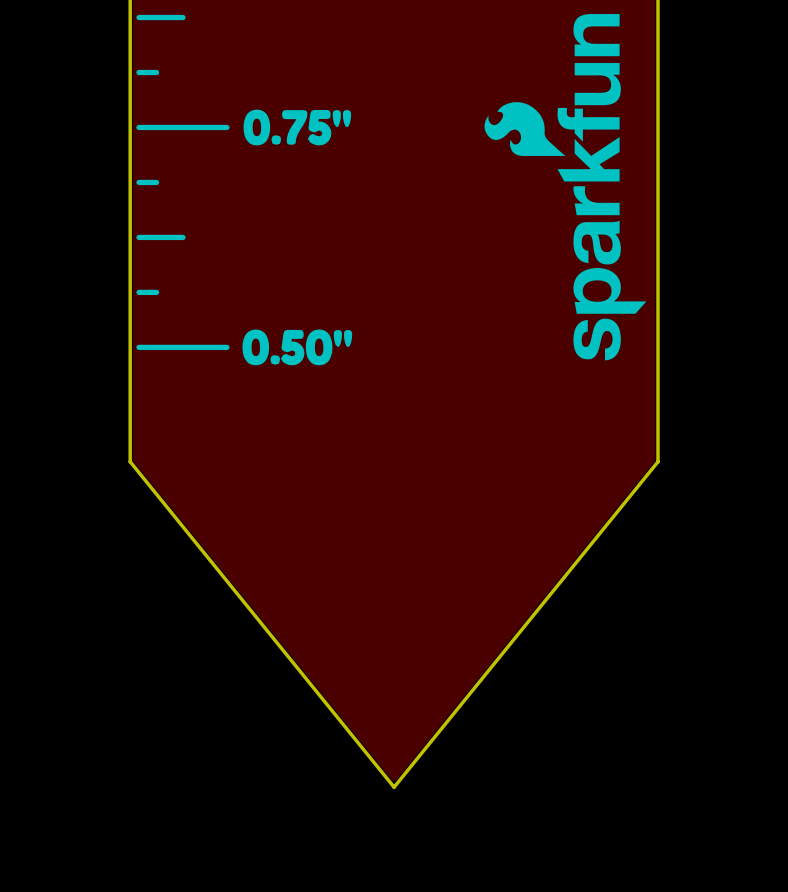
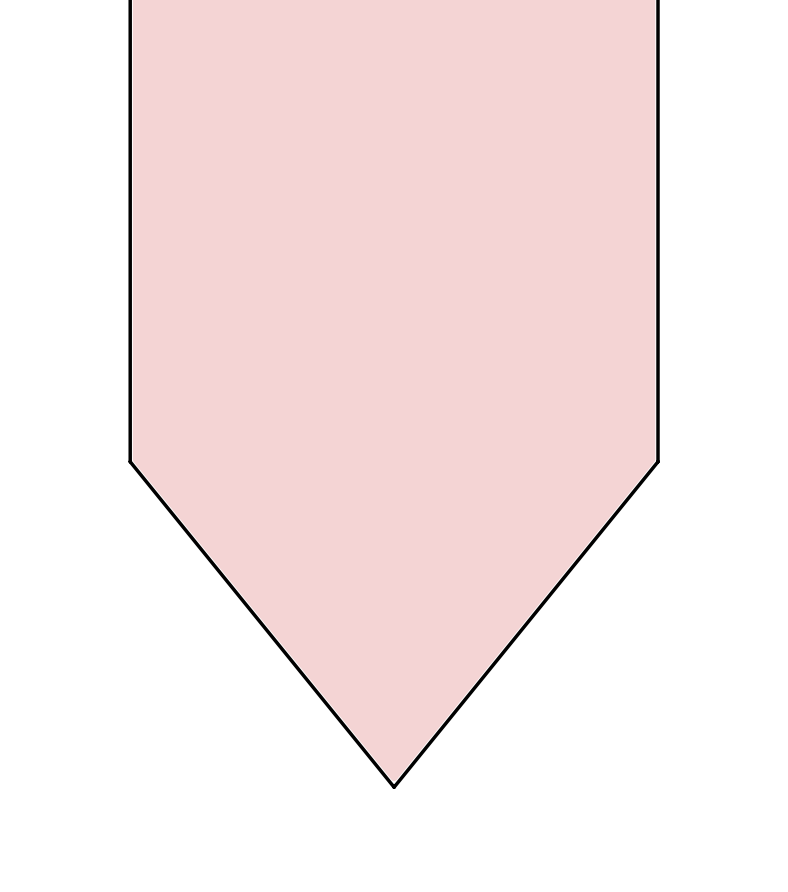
drawing: [484, 14, 647, 361] -> none
line: (139, 17) (182, 17) -> none
line: (139, 72) (156, 72) -> none
drawing: [243, 109, 352, 146] -> none
line: (139, 127) (226, 127) -> none
line: (139, 182) (156, 182) -> none
line: (139, 237) (182, 237) -> none
line: (139, 292) (156, 292) -> none
drawing: [242, 329, 353, 366] -> none
line: (139, 347) (226, 347) -> none

